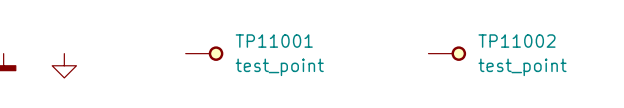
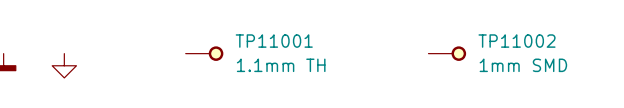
TP11001 value: test_point (279, 67) -> 1.1mm TH (281, 65)
TP11002 value: test_point (522, 67) -> 1mm SMD (523, 65)

